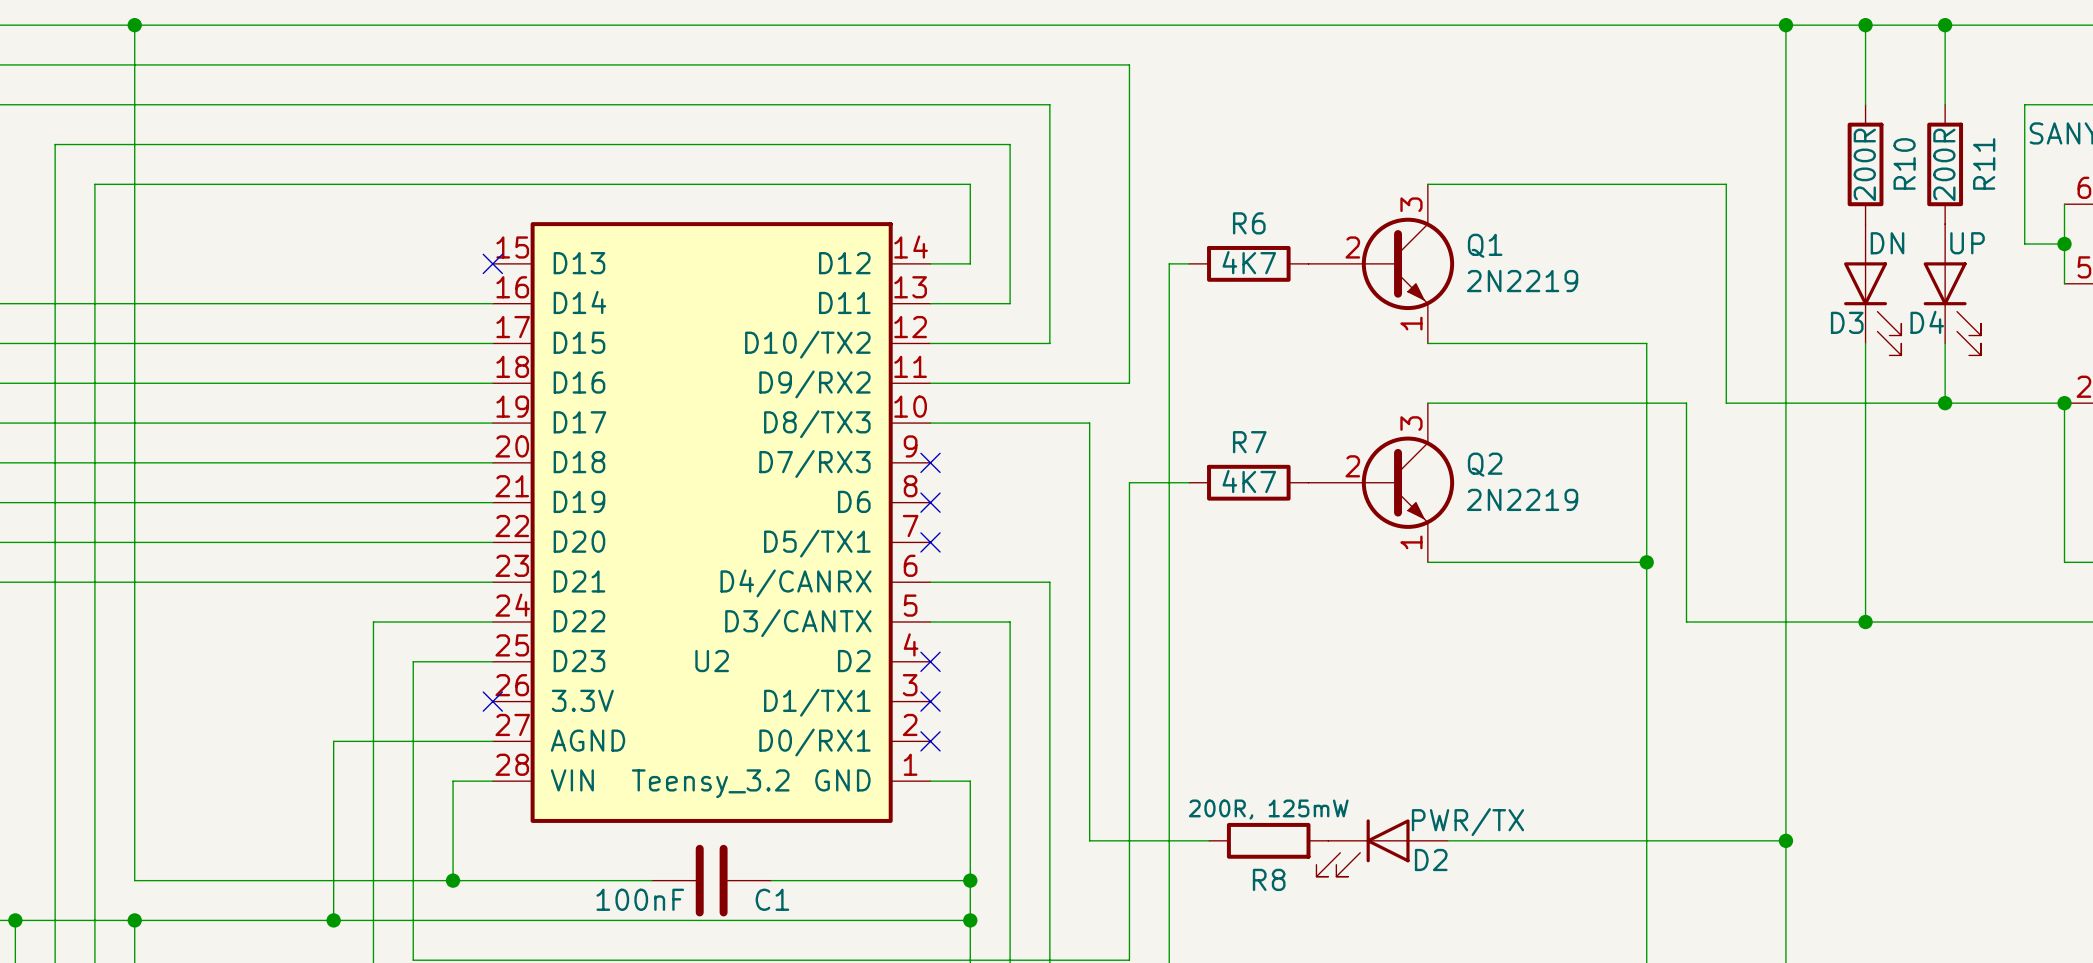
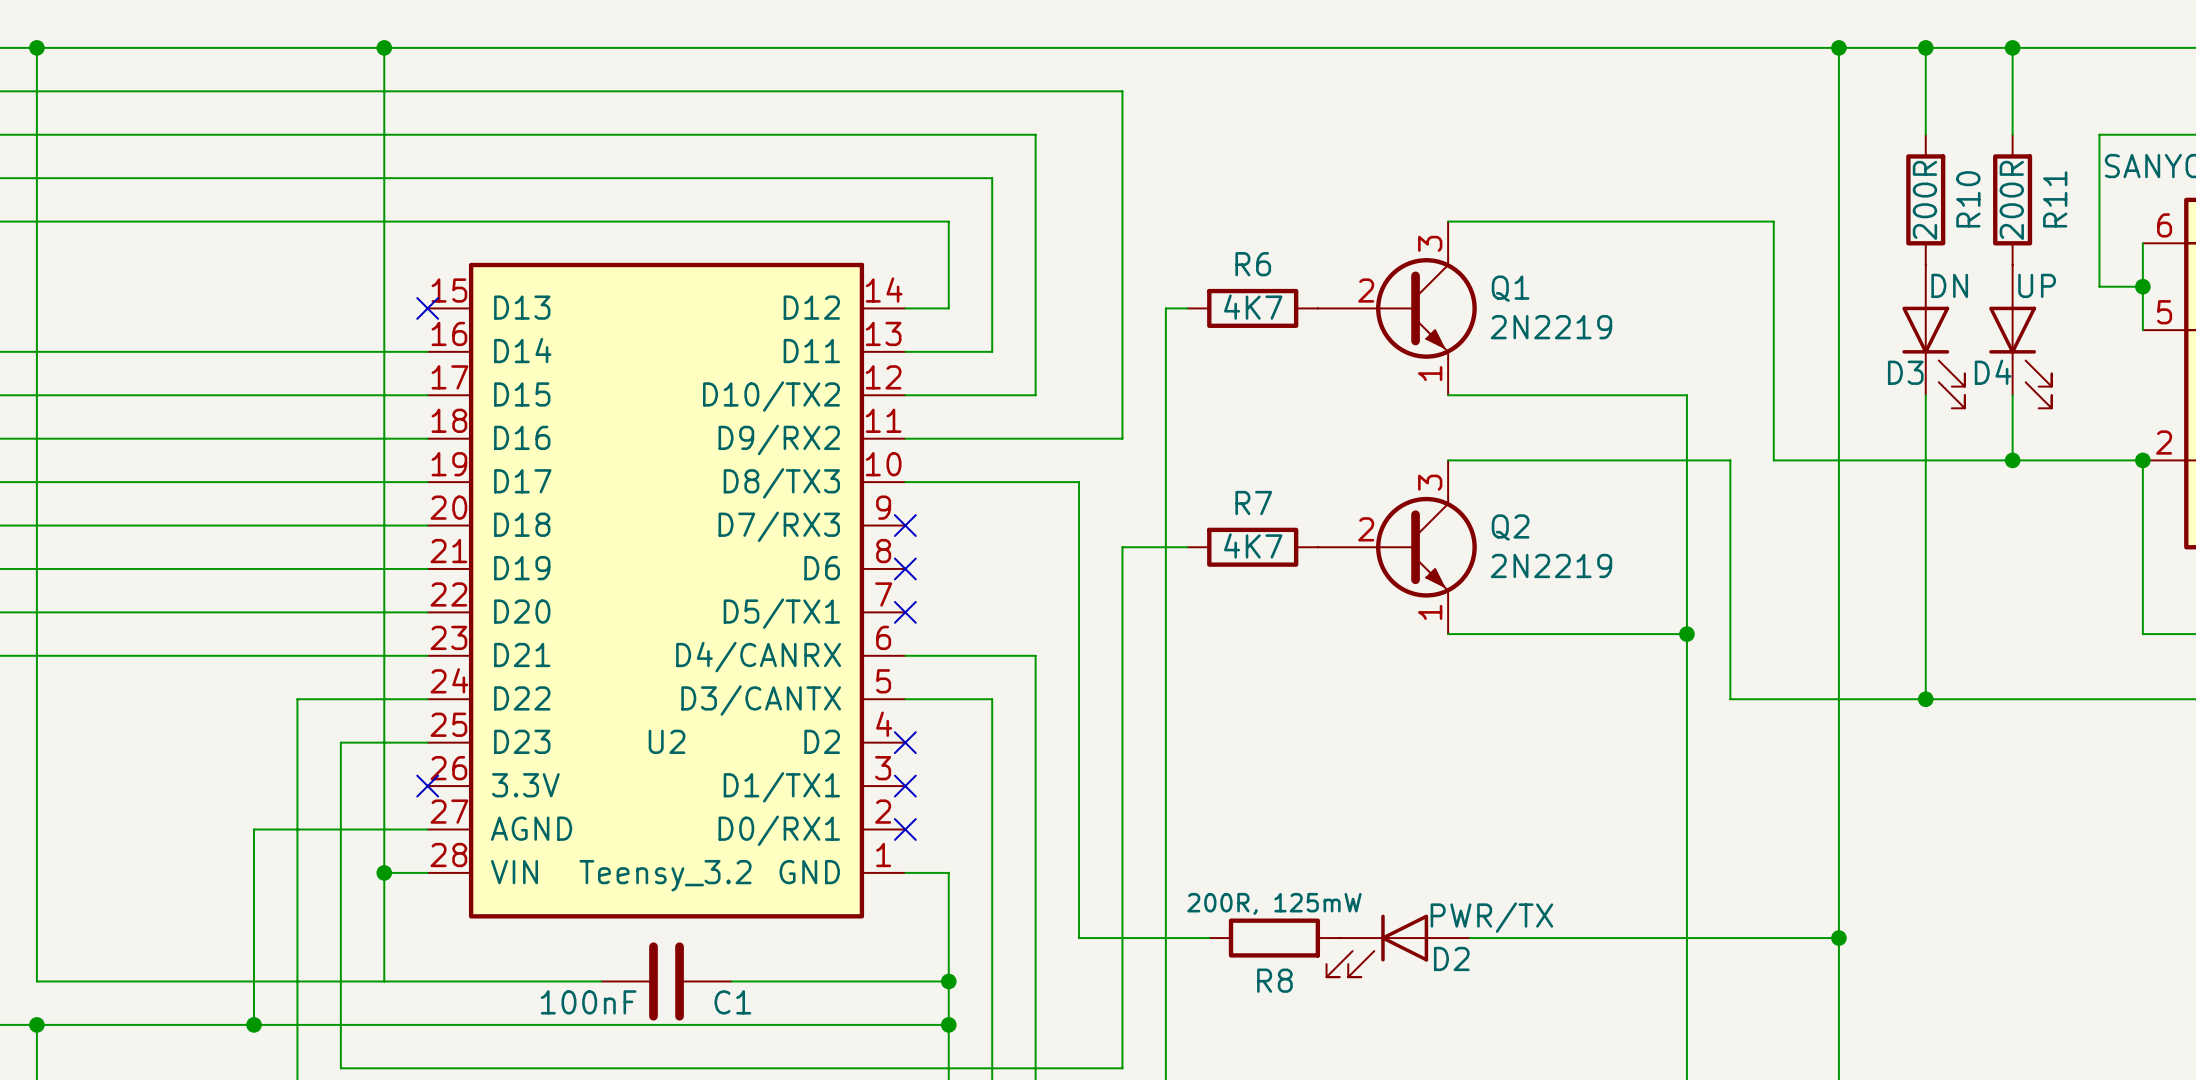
wire: none -> (384, 47) (384, 872)
junction: none -> (384, 47)
junction: none -> (384, 872)
junction: (453, 880) -> none

